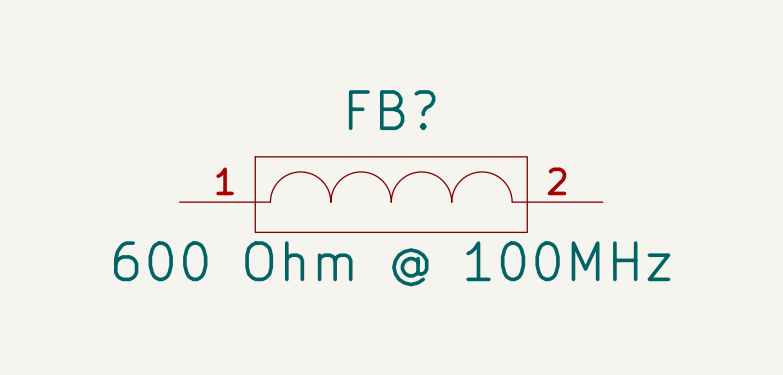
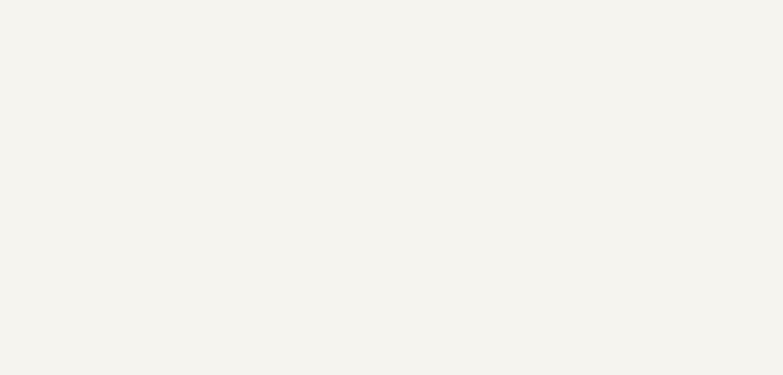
FB?: 600 Ohm @ 100MHz (391, 194) -> none

